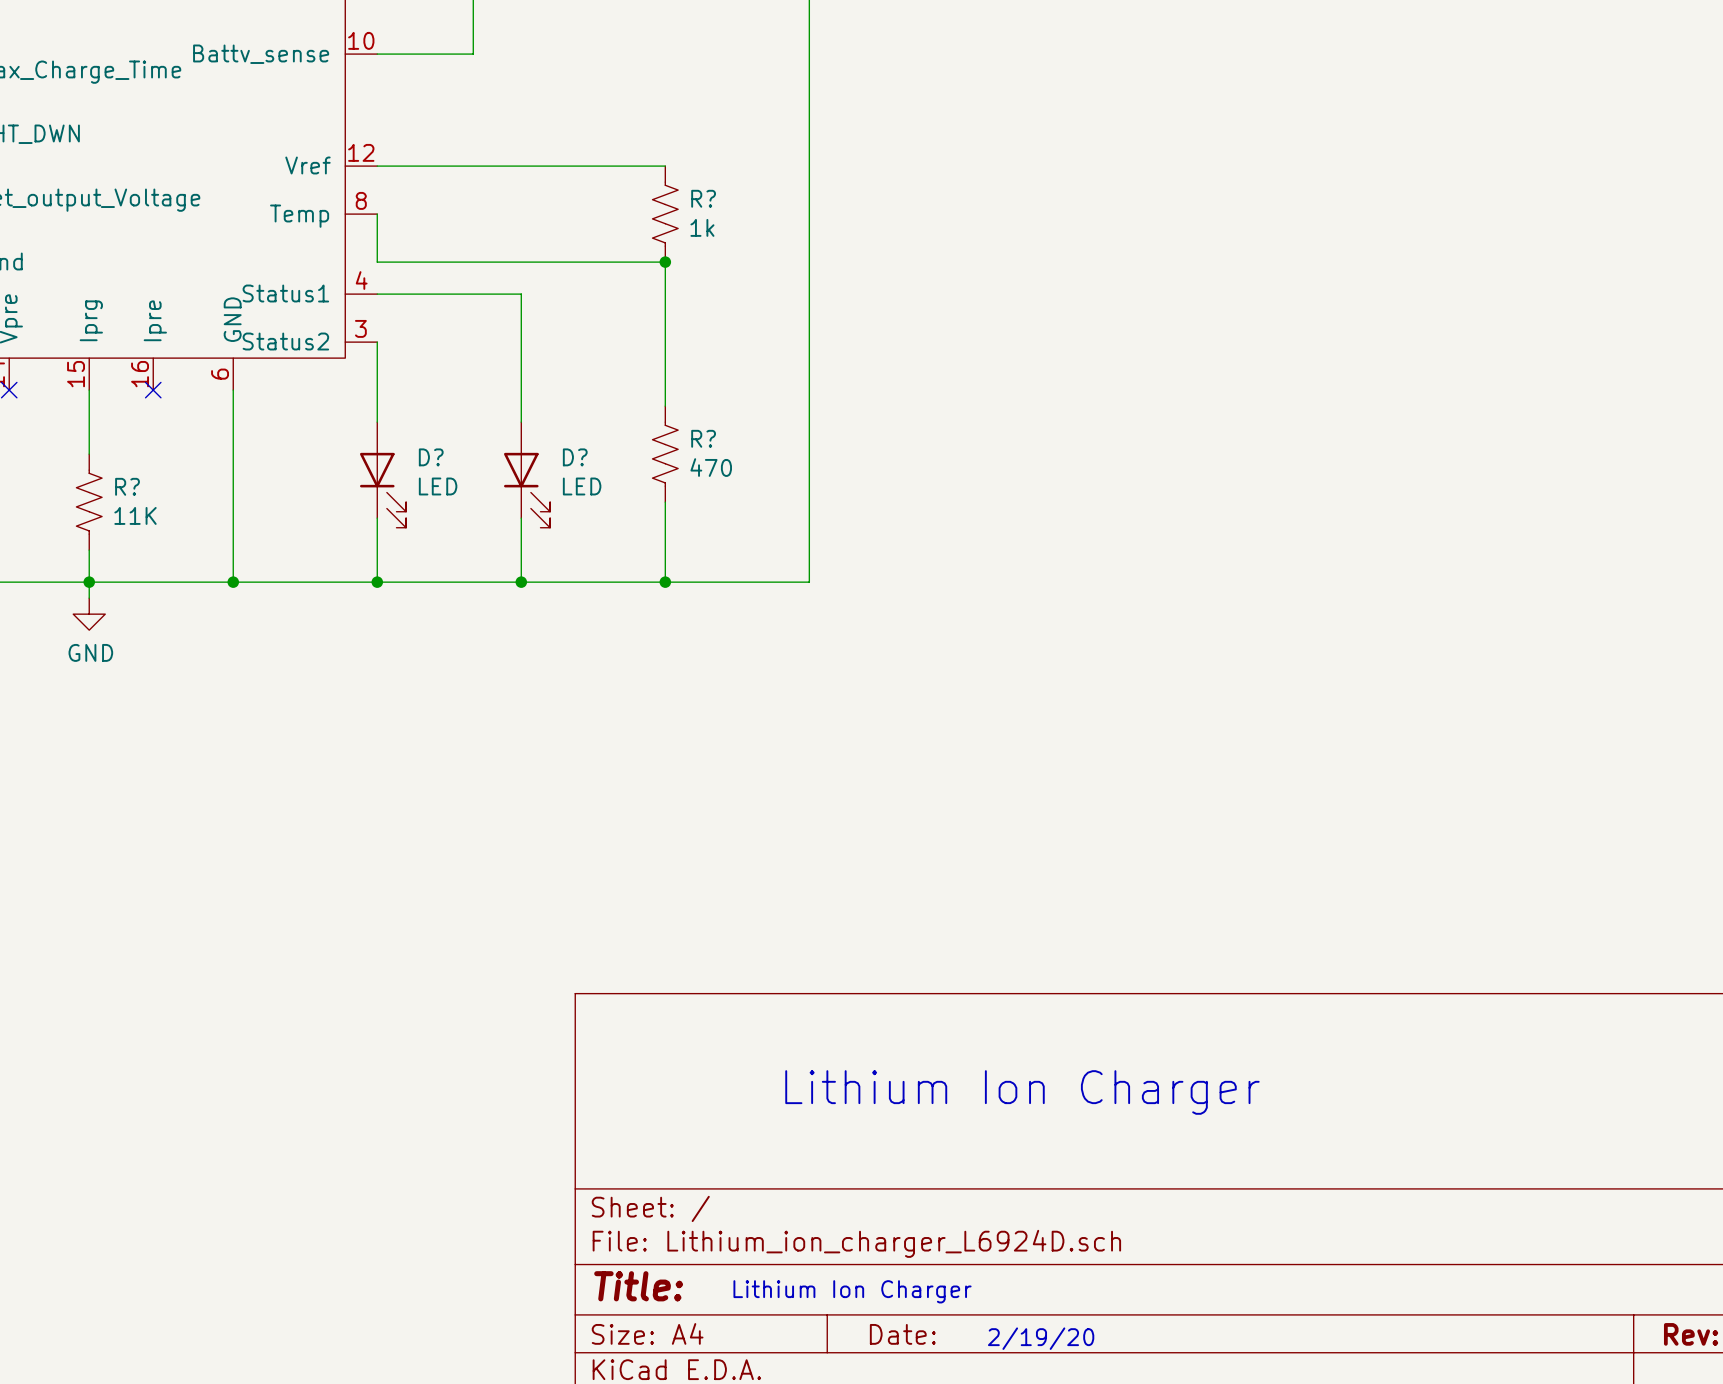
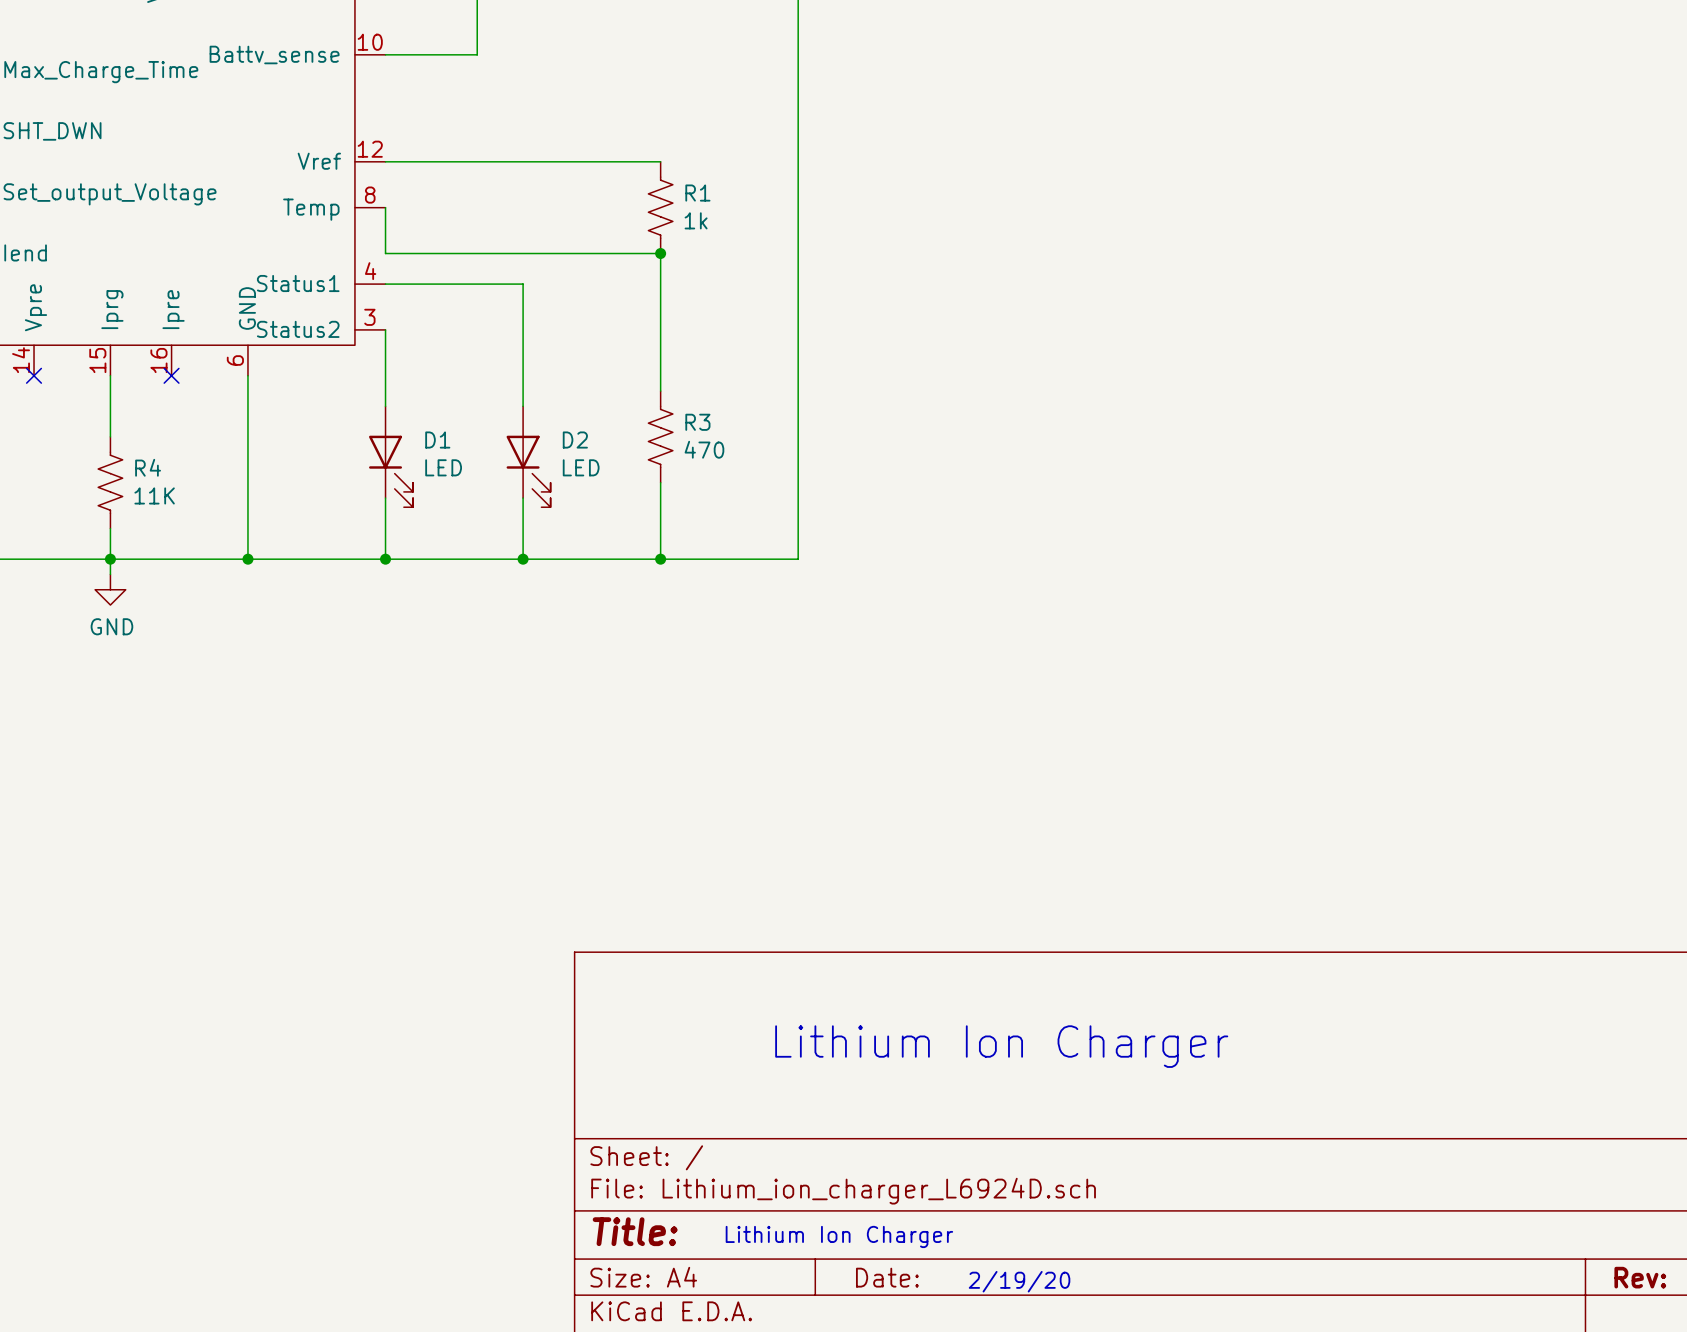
R? name: R? (703, 198) -> R1 (697, 193)
R? name: R? (703, 438) -> R3 (697, 422)
D? name: D? (431, 457) -> D1 (437, 440)
D? name: D? (575, 457) -> D2 (575, 440)
R? name: R? (127, 486) -> R4 (148, 467)

